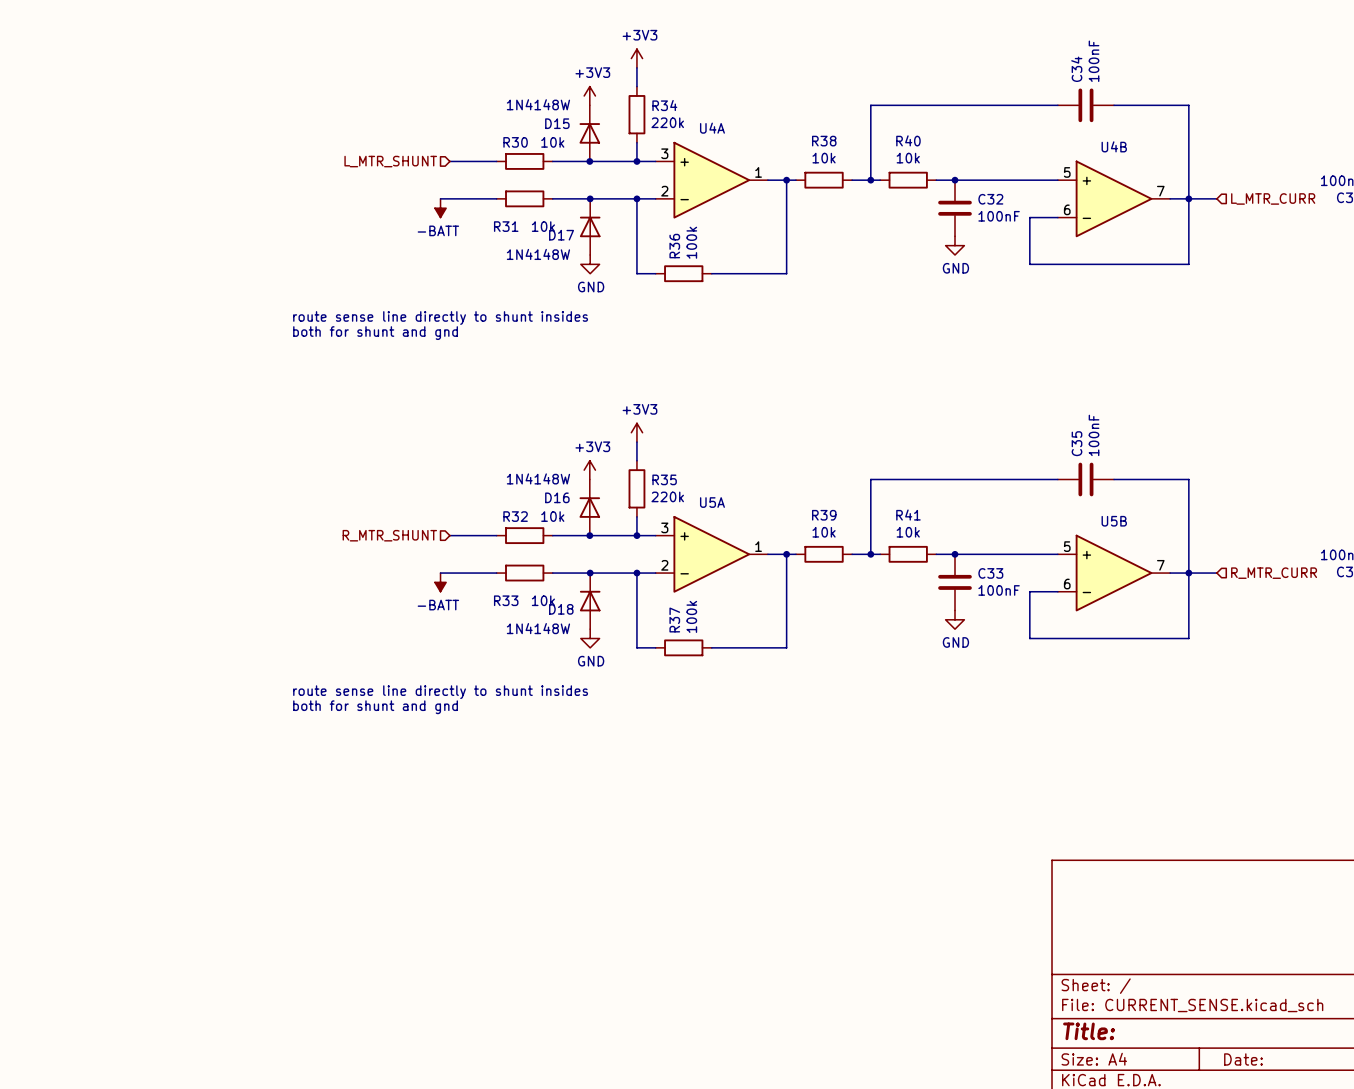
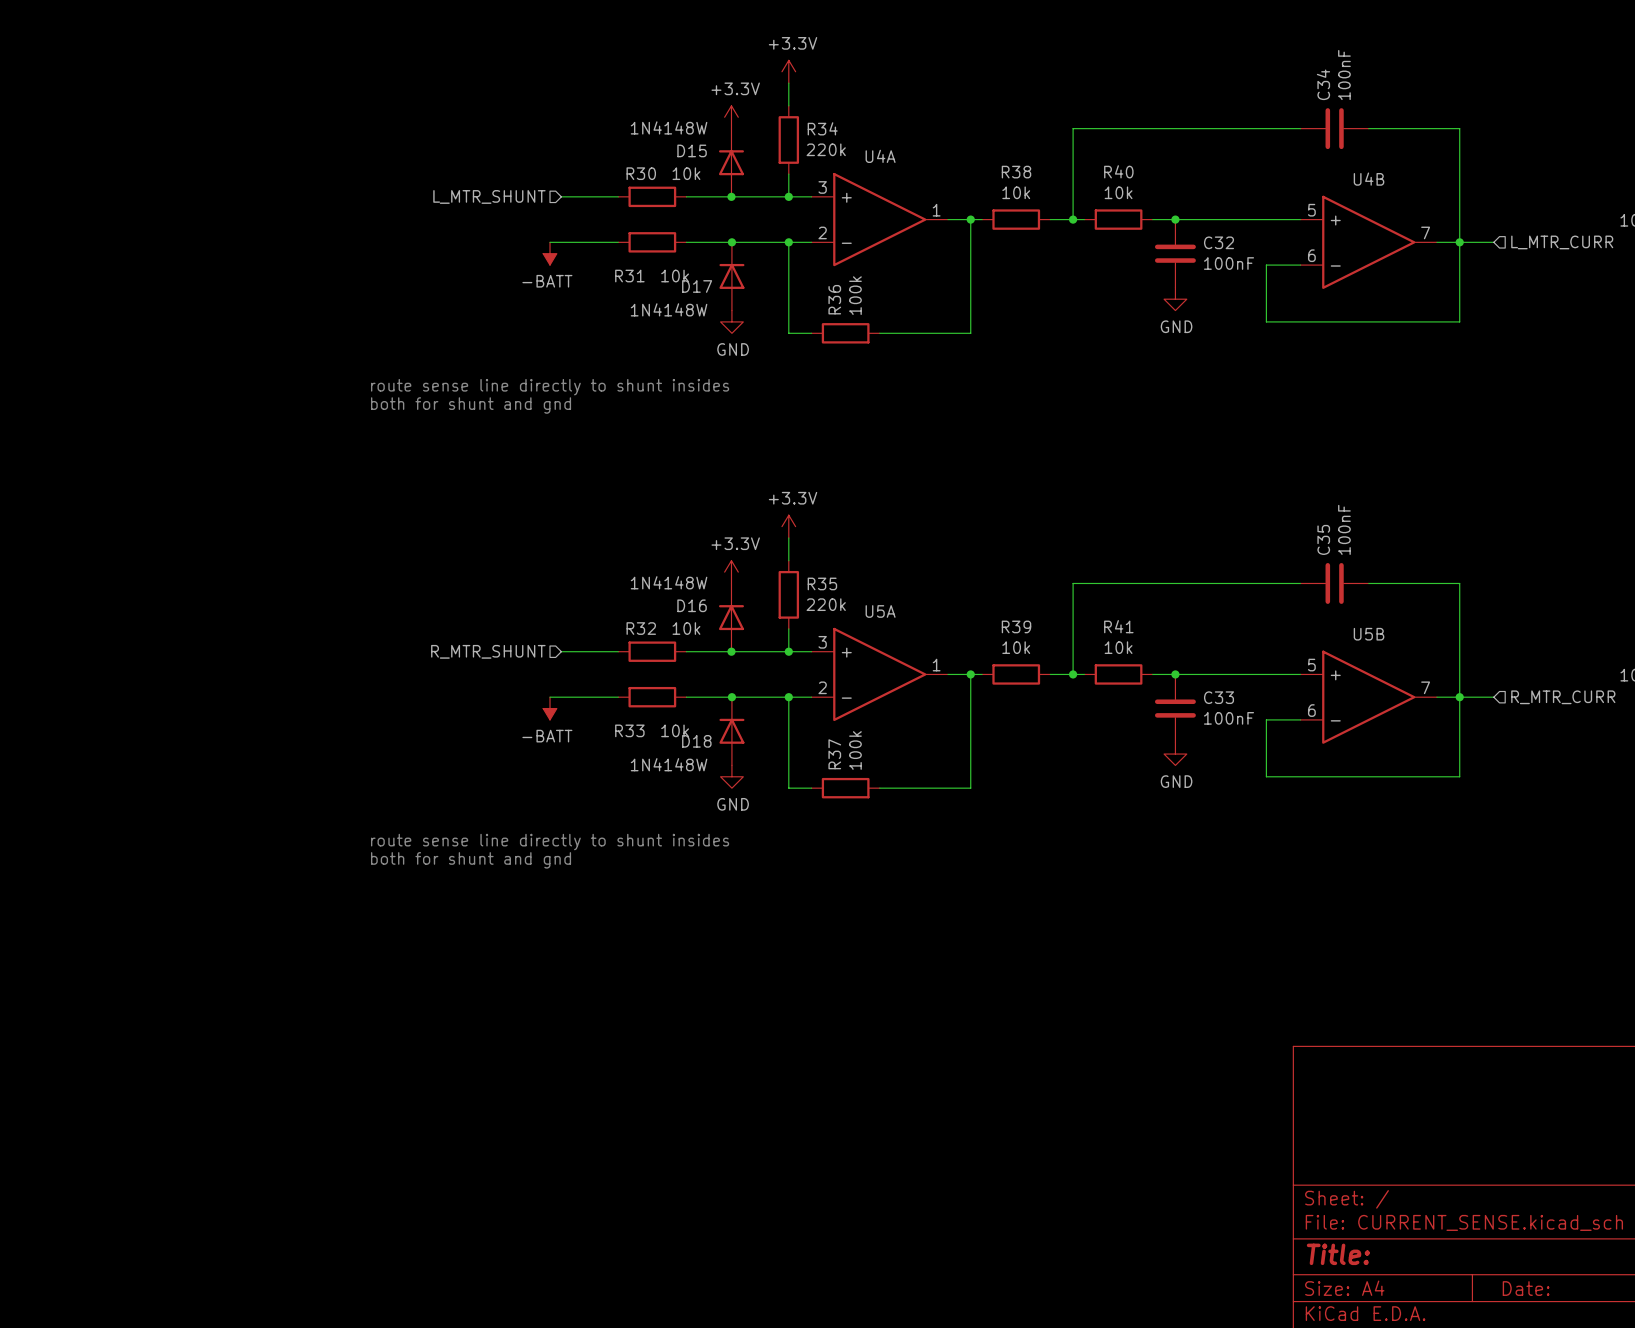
power symbol: +3V3 (636, 58) -> +3.3V (788, 71)
power symbol: +3V3 (589, 95) -> +3.3V (731, 117)
power symbol: +3V3 (636, 432) -> +3.3V (788, 526)
power symbol: +3V3 (589, 470) -> +3.3V (731, 572)

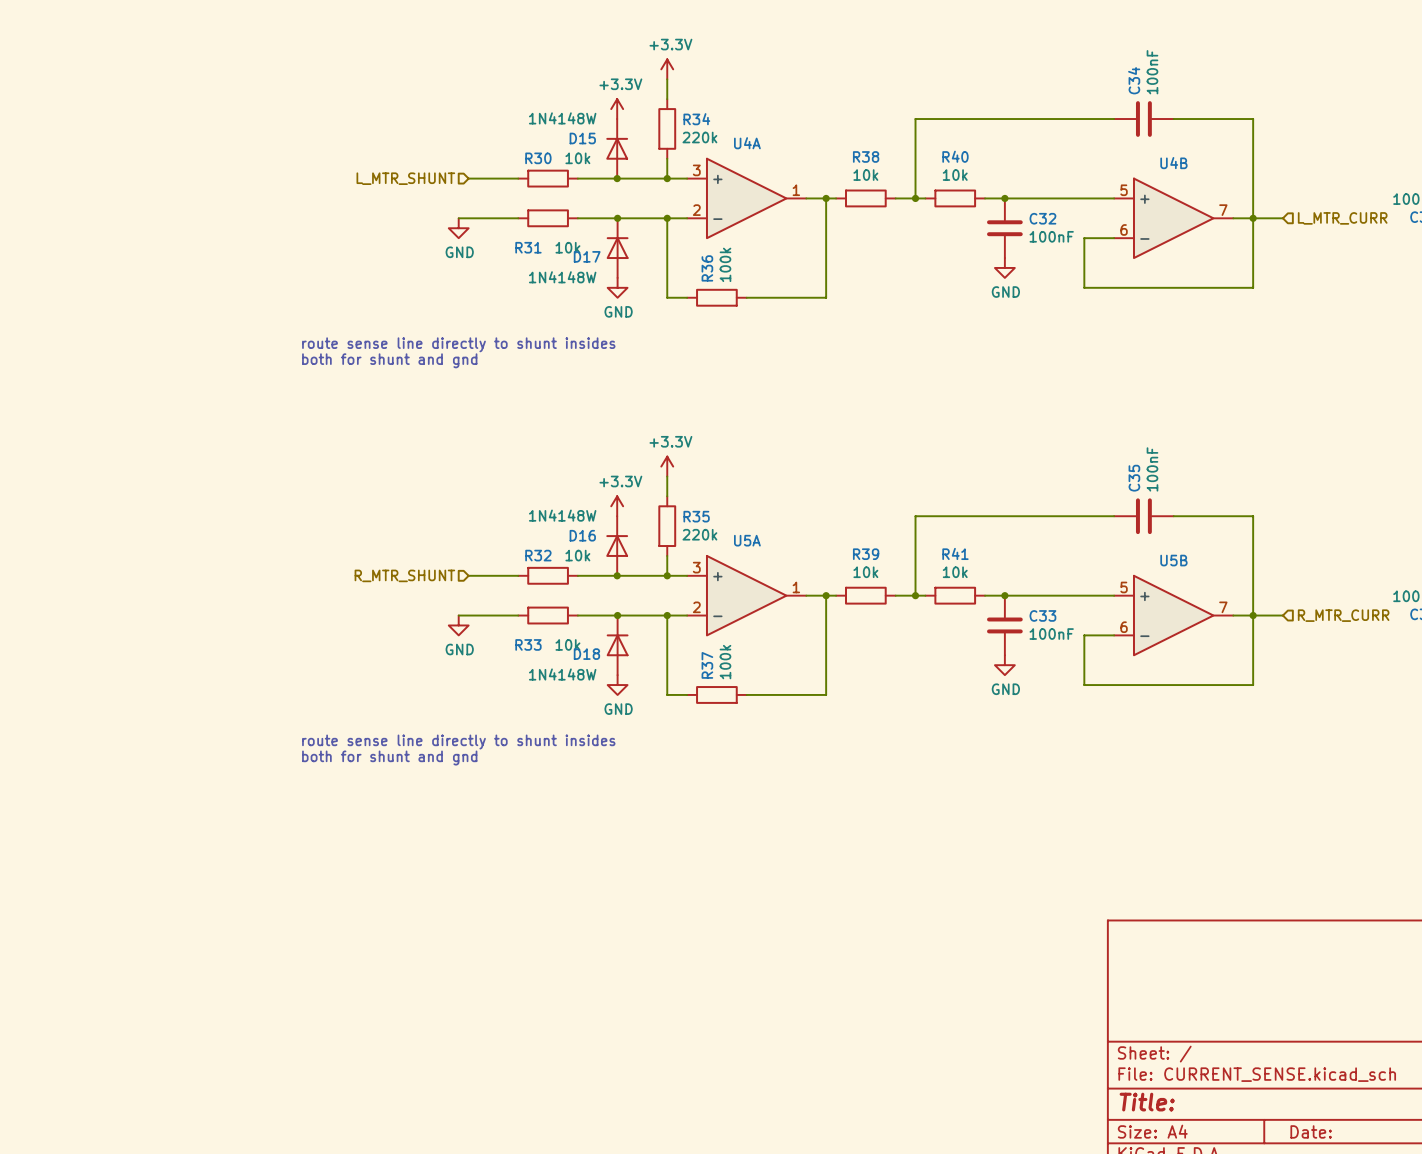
power symbol: -BATT (550, 253) -> GND (458, 228)
power symbol: -BATT (550, 708) -> GND (458, 625)

